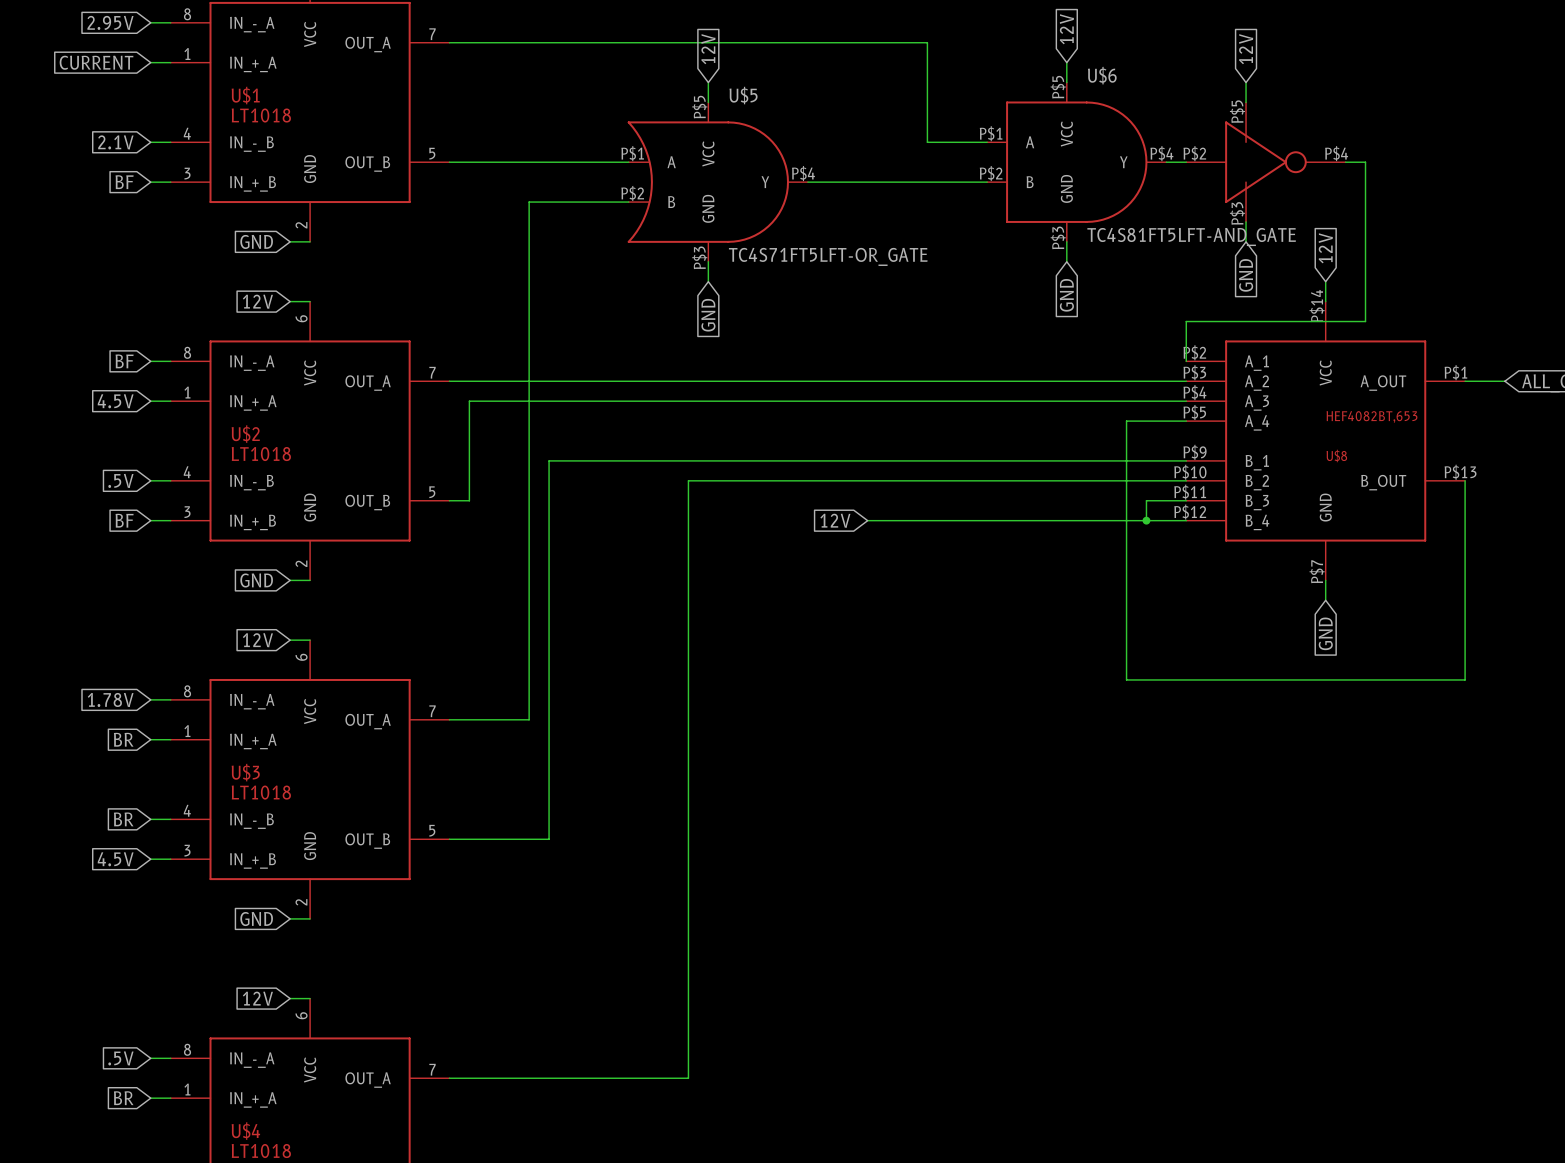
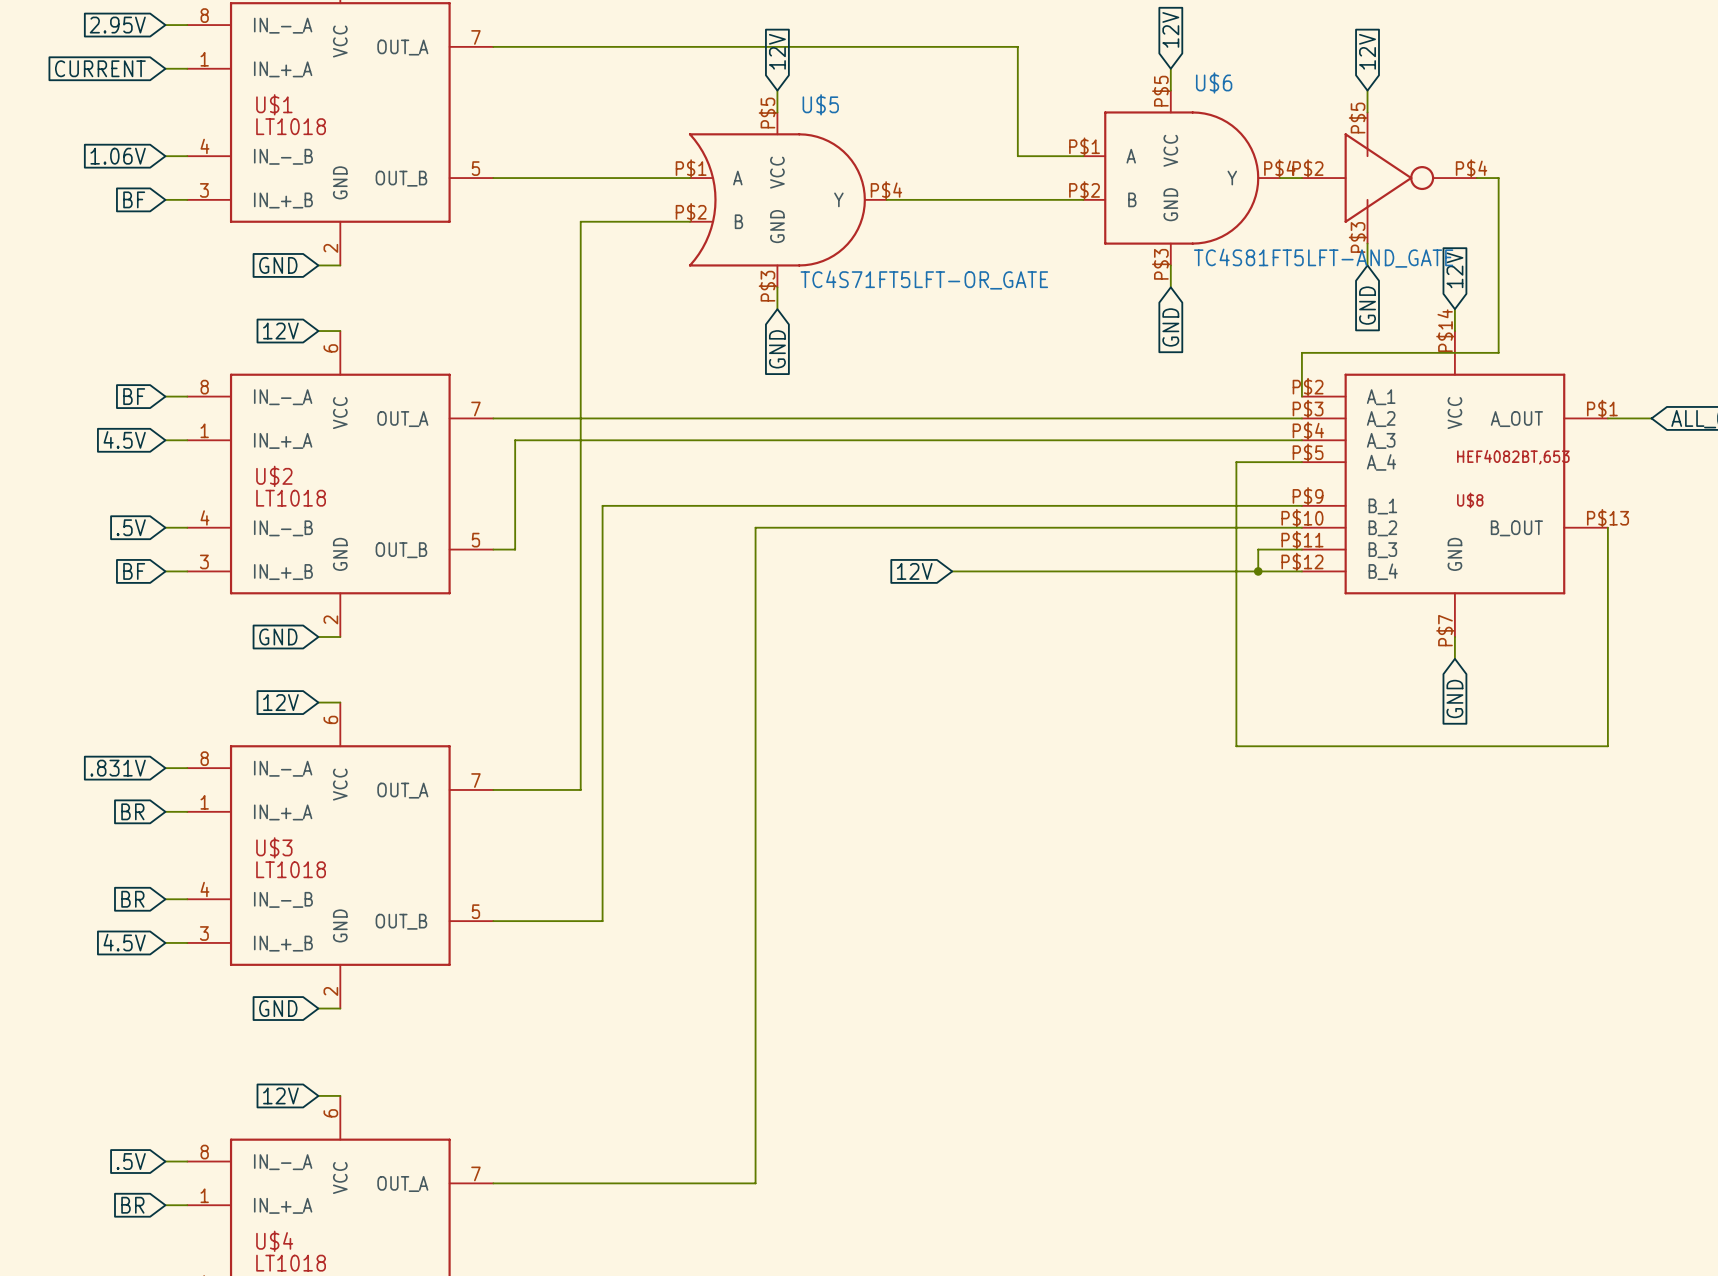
global label: 2.1V (115, 142) -> 1.06V (118, 156)
global label: 1.78V (110, 699) -> .831V (118, 768)

